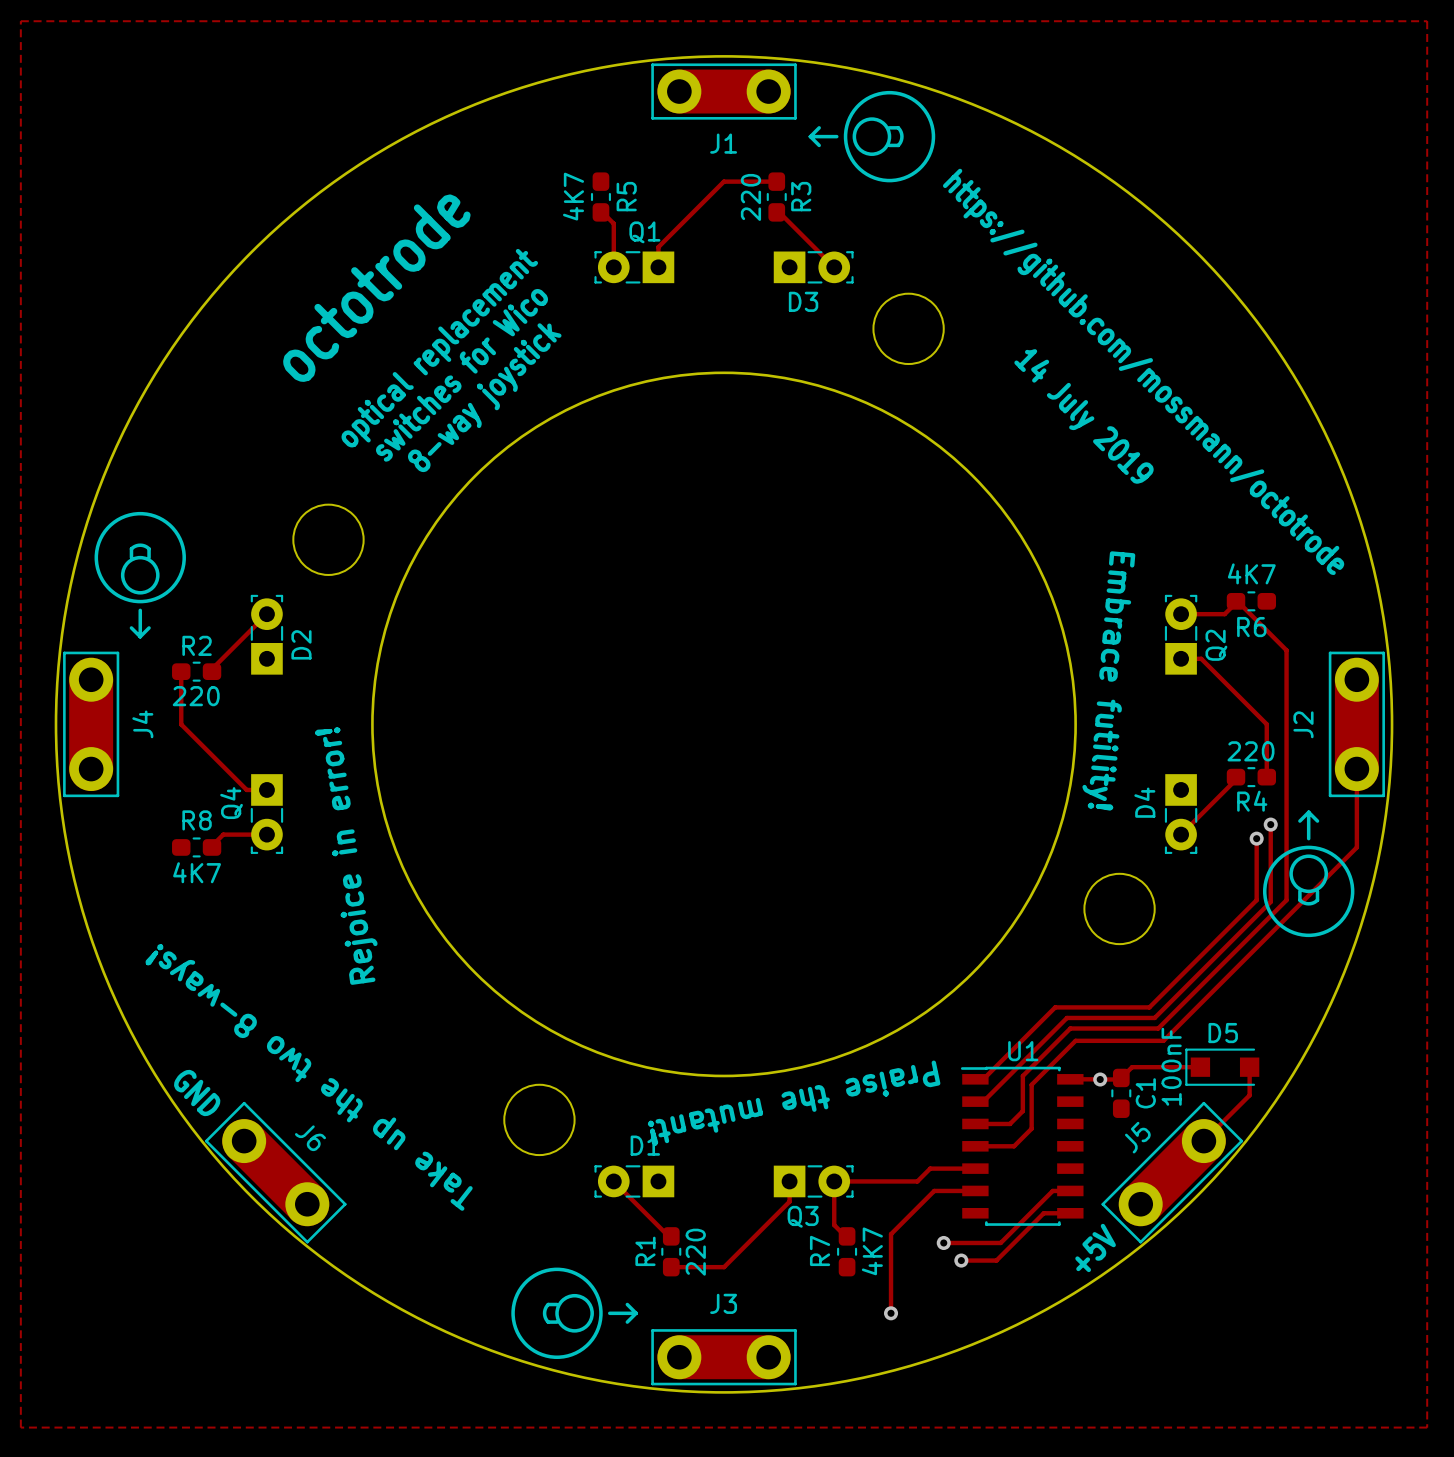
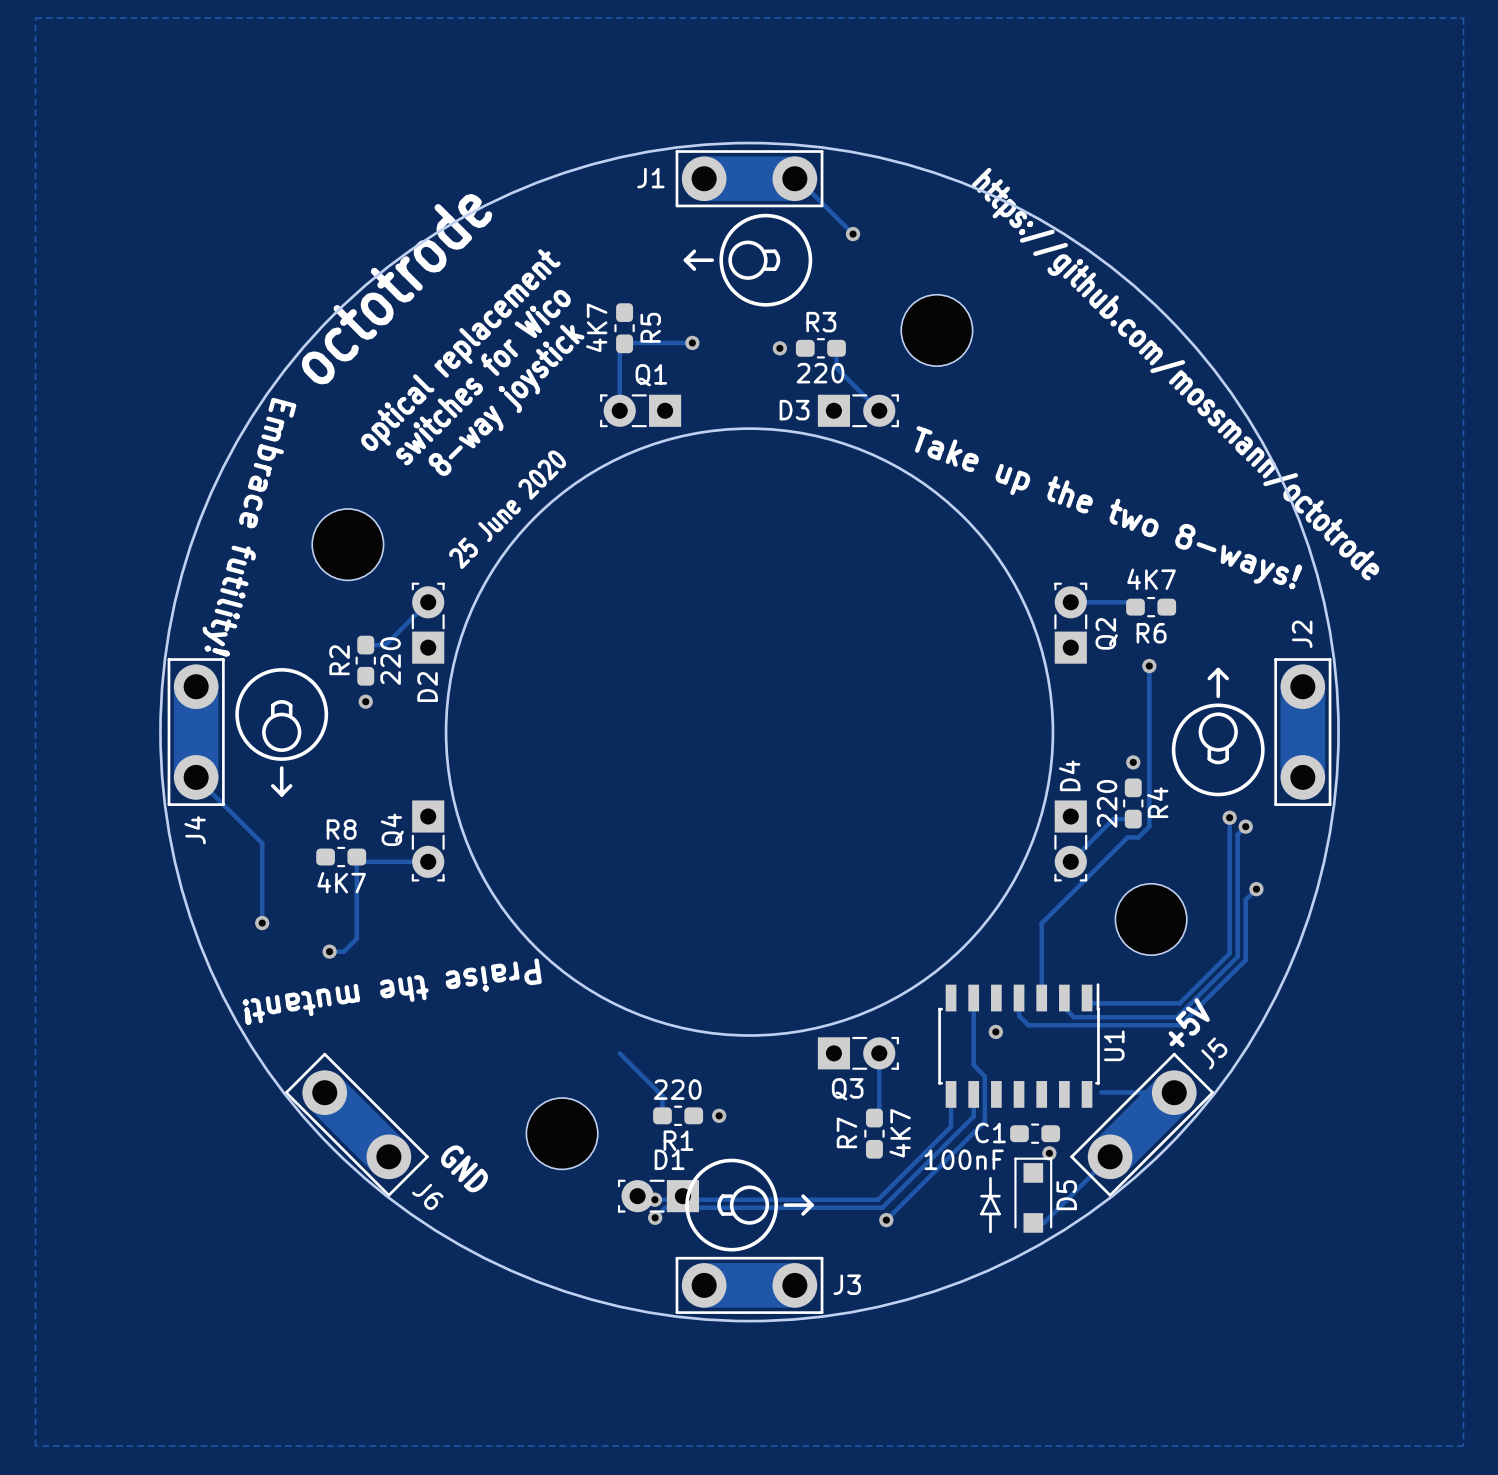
round board edge: [54, 55, 1394, 1394] -> none
track: (679, 91) (768, 91) -> none
J1 position: (724, 91) -> (749, 178)
line: (819, 127) (810, 136) -> (694, 251) (685, 260)
line: (889, 127) (898, 127) (901, 136) (898, 145) (889, 145) -> (765, 251) (774, 251) (778, 260) (774, 269) (765, 269)
line: (810, 136) (819, 145) -> (685, 260) (694, 269)
line: (810, 136) (836, 136) -> (685, 260) (712, 260)
drawing position: (871, 136) -> (747, 260)
drawing position: (889, 136) -> (765, 260)
round board edge: none -> [159, 141, 1340, 1323]
J1 name position: J1 (723, 143) -> J1 (650, 178)
track: none -> (704, 178) (797, 178) (853, 234)
track: (776, 181) (723, 181) (658, 247) (658, 267) -> none
R3 name position: R3 (801, 196) -> R3 (821, 322)
R5 position: (600, 197) -> (624, 328)
R3 value position: 220 (750, 197) -> 220 (820, 373)
R3 rotation: 0° (776, 197) -> 90° clockwise (820, 348)
R3 position: (776, 197) -> (820, 348)
track: (600, 210) (613, 223) (613, 267) -> none
track: (776, 212) (779, 212) (834, 267) -> none
via: none -> (853, 234)
Q1 position: (634, 267) -> (640, 410)
D3 position: (813, 267) -> (858, 410)
D3 name position: D3 (803, 301) -> D3 (794, 410)
track: none -> (692, 342) (625, 342) (619, 348) (619, 410)
via: none -> (692, 342)
via: none -> (779, 348)
track: none -> (836, 348) (836, 368) (879, 410)
round board edge: [371, 371, 1077, 1078] -> none
text: 14 July 2019 (1084, 416) -> none
round board edge: none -> [444, 427, 1055, 1037]
text: none -> Take up the two 8-ways! (1108, 507)
text: none -> 25 June 2020 (507, 509)
text: none -> Embrace futility! (249, 527)
line: (131, 557) (131, 548) (140, 545) (149, 548) (149, 557) -> (272, 714) (272, 705) (281, 701) (290, 705) (290, 714)
drawing position: (140, 557) -> (281, 714)
drawing position: (140, 575) -> (281, 732)
track: none -> (428, 602) (385, 645) (365, 645)
track: none -> (1070, 602) (1130, 602) (1135, 607)
R6 position: (1251, 601) -> (1151, 607)
line: (140, 610) (140, 636) -> (281, 768) (281, 794)
track: (266, 614) (212, 669) (212, 671) -> none
track: (1181, 614) (1224, 614) (1237, 601) (1286, 650) (1286, 900) (1158, 1028) (1070, 1028) (1022, 1075) (1022, 1111) (1010, 1123) (975, 1123) -> none
line: (131, 627) (140, 636) -> (272, 785) (281, 794)
line: (149, 627) (140, 636) -> (290, 785) (281, 794)
D2 position: (266, 634) -> (428, 623)
Q2 position: (1181, 634) -> (1070, 623)
D2 name position: D2 (301, 644) -> D2 (427, 687)
R2 name position: R2 (197, 645) -> R2 (339, 660)
track: (1181, 658) (1201, 658) (1266, 724) (1266, 777) -> none
track: none -> (1149, 666) (1149, 826) (1138, 837) (1127, 837) (1041, 923) (1041, 998)
via: none -> (1149, 666)
track: (181, 671) (181, 724) (246, 789) (266, 789) -> none
R2 rotation: 0° (196, 671) -> 90° clockwise (365, 660)
R2 position: (196, 671) -> (365, 660)
track: (91, 679) (91, 769) -> none
track: none -> (196, 686) (196, 777) (262, 843) (262, 923)
track: none -> (1302, 686) (1302, 777)
track: (1356, 679) (1356, 847) (1163, 1040) (1075, 1040) (1031, 1084) (1031, 1128) (1014, 1146) (975, 1146) -> none
text: Embrace futility! (1108, 680) -> none
via: none -> (365, 701)
R2 value position: 220 (196, 696) -> 220 (390, 661)
J4 position: (91, 724) -> (196, 732)
J4 name position: J4 (142, 724) -> J4 (195, 830)
J2 name position: J2 (1303, 724) -> J2 (1302, 634)
J2 position: (1356, 724) -> (1302, 732)
R4 value position: 220 (1250, 751) -> 220 (1107, 803)
via: none -> (1133, 762)
track: (1236, 777) (1236, 779) (1181, 834) -> none
R4 rotation: 0° (1251, 777) -> 90° clockwise (1133, 803)
R4 position: (1251, 777) -> (1133, 803)
R4 name position: R4 (1252, 801) -> R4 (1157, 802)
D4 name position: D4 (1144, 802) -> D4 (1069, 775)
track: none -> (1229, 817) (1229, 953) (1179, 1003) (1092, 1003) (1087, 998)
via: none -> (1229, 817)
track: none -> (1133, 819) (1113, 819) (1070, 861)
line: (1308, 812) (1317, 821) -> (1218, 669) (1227, 678)
line: (1308, 812) (1299, 821) -> (1218, 669) (1209, 678)
line: (1308, 812) (1308, 838) -> (1218, 669) (1218, 696)
Q4 position: (266, 814) -> (428, 840)
D4 position: (1181, 814) -> (1070, 840)
track: none -> (1245, 826) (1237, 834) (1237, 956) (1177, 1017) (1073, 1017) (1064, 1007) (1064, 998)
via: none -> (1245, 826)
track: (1270, 824) (1270, 901) (1154, 1017) (1066, 1017) (983, 1101) (975, 1101) -> none
via: (1270, 824) -> none
track: (266, 834) (223, 834) (210, 847) -> none
track: (1256, 838) (1256, 900) (1149, 1007) (1055, 1007) (983, 1079) (975, 1079) -> none
via: (1256, 838) -> none
R8 position: (196, 847) -> (341, 857)
track: none -> (428, 861) (361, 861) (356, 857) (356, 938) (343, 951) (329, 951)
text: Rejoice in error! (346, 855) -> none
drawing position: (1308, 873) -> (1218, 732)
track: none -> (1256, 889) (1245, 899) (1245, 960) (1180, 1025) (1028, 1025) (1019, 1015) (1019, 998)
via: none -> (1256, 889)
line: (1299, 891) (1299, 900) (1308, 903) (1317, 900) (1317, 891) -> (1209, 749) (1209, 758) (1218, 762) (1227, 758) (1227, 749)
drawing position: (1308, 891) -> (1218, 749)
via: none -> (262, 923)
via: none -> (329, 951)
track: none -> (973, 998) (973, 1065) (984, 1076) (984, 1121) (886, 1220)
via: none -> (995, 1031)
track: none -> (619, 1053) (662, 1096) (662, 1115)
track: none -> (879, 1053) (879, 1113) (874, 1118)
C1 value position: 100nF (1171, 1066) -> 100nF (964, 1159)
track: (1200, 1067) (1132, 1067) (1121, 1077) -> none
D5 rotation: 0° (1222, 1067) -> 90° clockwise (1033, 1195)
D5 position: (1222, 1067) -> (1033, 1195)
track: (1249, 1067) (1249, 1095) (1140, 1204) -> none
text: Take up the two 8-ways! (309, 1077) -> none
via: (1100, 1079) -> none
track: none -> (1174, 1092) (1044, 1222) (1033, 1222)
track: none -> (951, 1094) (951, 1126) (878, 1199) (654, 1199)
track: none -> (973, 1094) (973, 1116) (882, 1207) (665, 1207) (655, 1217)
text position: GND (197, 1093) -> GND (464, 1168)
C1 rotation: 0° (1121, 1093) -> 90° clockwise (1035, 1133)
C1 position: (1121, 1093) -> (1035, 1133)
C1 name position: C1 (1145, 1093) -> C1 (990, 1133)
via: none -> (719, 1115)
text rotation: 0° (794, 1103) -> 4° clockwise (392, 991)
text position: Praise the mutant! (794, 1103) -> Praise the mutant! (392, 991)
J5 name position: J5 (1137, 1137) -> J5 (1214, 1053)
J6 name position: J6 (310, 1138) -> J6 (427, 1196)
via: none -> (1049, 1153)
track: (244, 1141) (307, 1204) -> (324, 1092) (388, 1156)
U1 rotation: 0° (1022, 1146) -> 90° clockwise (1019, 1045)
U1 position: (1022, 1146) -> (1019, 1045)
line: none -> (990, 1178) (990, 1196)
track: (975, 1168) (930, 1168) (917, 1181) (834, 1181) (834, 1225) (847, 1237) -> none
J6 position: (275, 1172) -> (356, 1124)
J5 position: (1172, 1172) -> (1142, 1124)
track: (613, 1181) (668, 1236) (671, 1236) -> none
track: (789, 1181) (789, 1201) (724, 1267) (671, 1267) -> none
Q3 position: (813, 1181) -> (858, 1053)
line: none -> (981, 1196) (999, 1196)
line: none -> (990, 1196) (999, 1214) (981, 1214) (990, 1196)
via: none -> (654, 1199)
track: (975, 1190) (934, 1190) (891, 1234) (891, 1313) -> none
track: (1070, 1190) (1052, 1190) (1000, 1242) (943, 1242) -> none
line: none -> (990, 1214) (990, 1231)
via: none -> (655, 1217)
via: none -> (886, 1220)
track: (1070, 1213) (1043, 1213) (996, 1260) (961, 1260) -> none
via: (943, 1242) -> none
text position: +5V (1095, 1247) -> +5V (1189, 1022)
R1 name position: R1 (645, 1251) -> R1 (678, 1140)
R1 rotation: 0° (671, 1251) -> 90° clockwise (678, 1115)
R1 position: (671, 1251) -> (678, 1115)
R7 position: (847, 1251) -> (874, 1133)
R1 value position: 220 (695, 1252) -> 220 (677, 1089)
via: (961, 1260) -> none
J3 name position: J3 (723, 1303) -> J3 (847, 1284)
line: (557, 1304) (548, 1304) (544, 1313) (548, 1322) (557, 1322) -> (731, 1196) (722, 1196) (719, 1205) (722, 1214) (731, 1214)
line: (627, 1304) (636, 1313) -> (803, 1196) (811, 1205)
drawing position: (557, 1313) -> (731, 1205)
drawing position: (574, 1313) -> (749, 1205)
line: (609, 1313) (636, 1313) -> (785, 1205) (811, 1205)
line: (636, 1313) (627, 1322) -> (811, 1205) (803, 1214)
via: (891, 1313) -> none
track: (679, 1357) (768, 1357) -> (704, 1285) (794, 1285)
J3 position: (724, 1357) -> (749, 1285)

